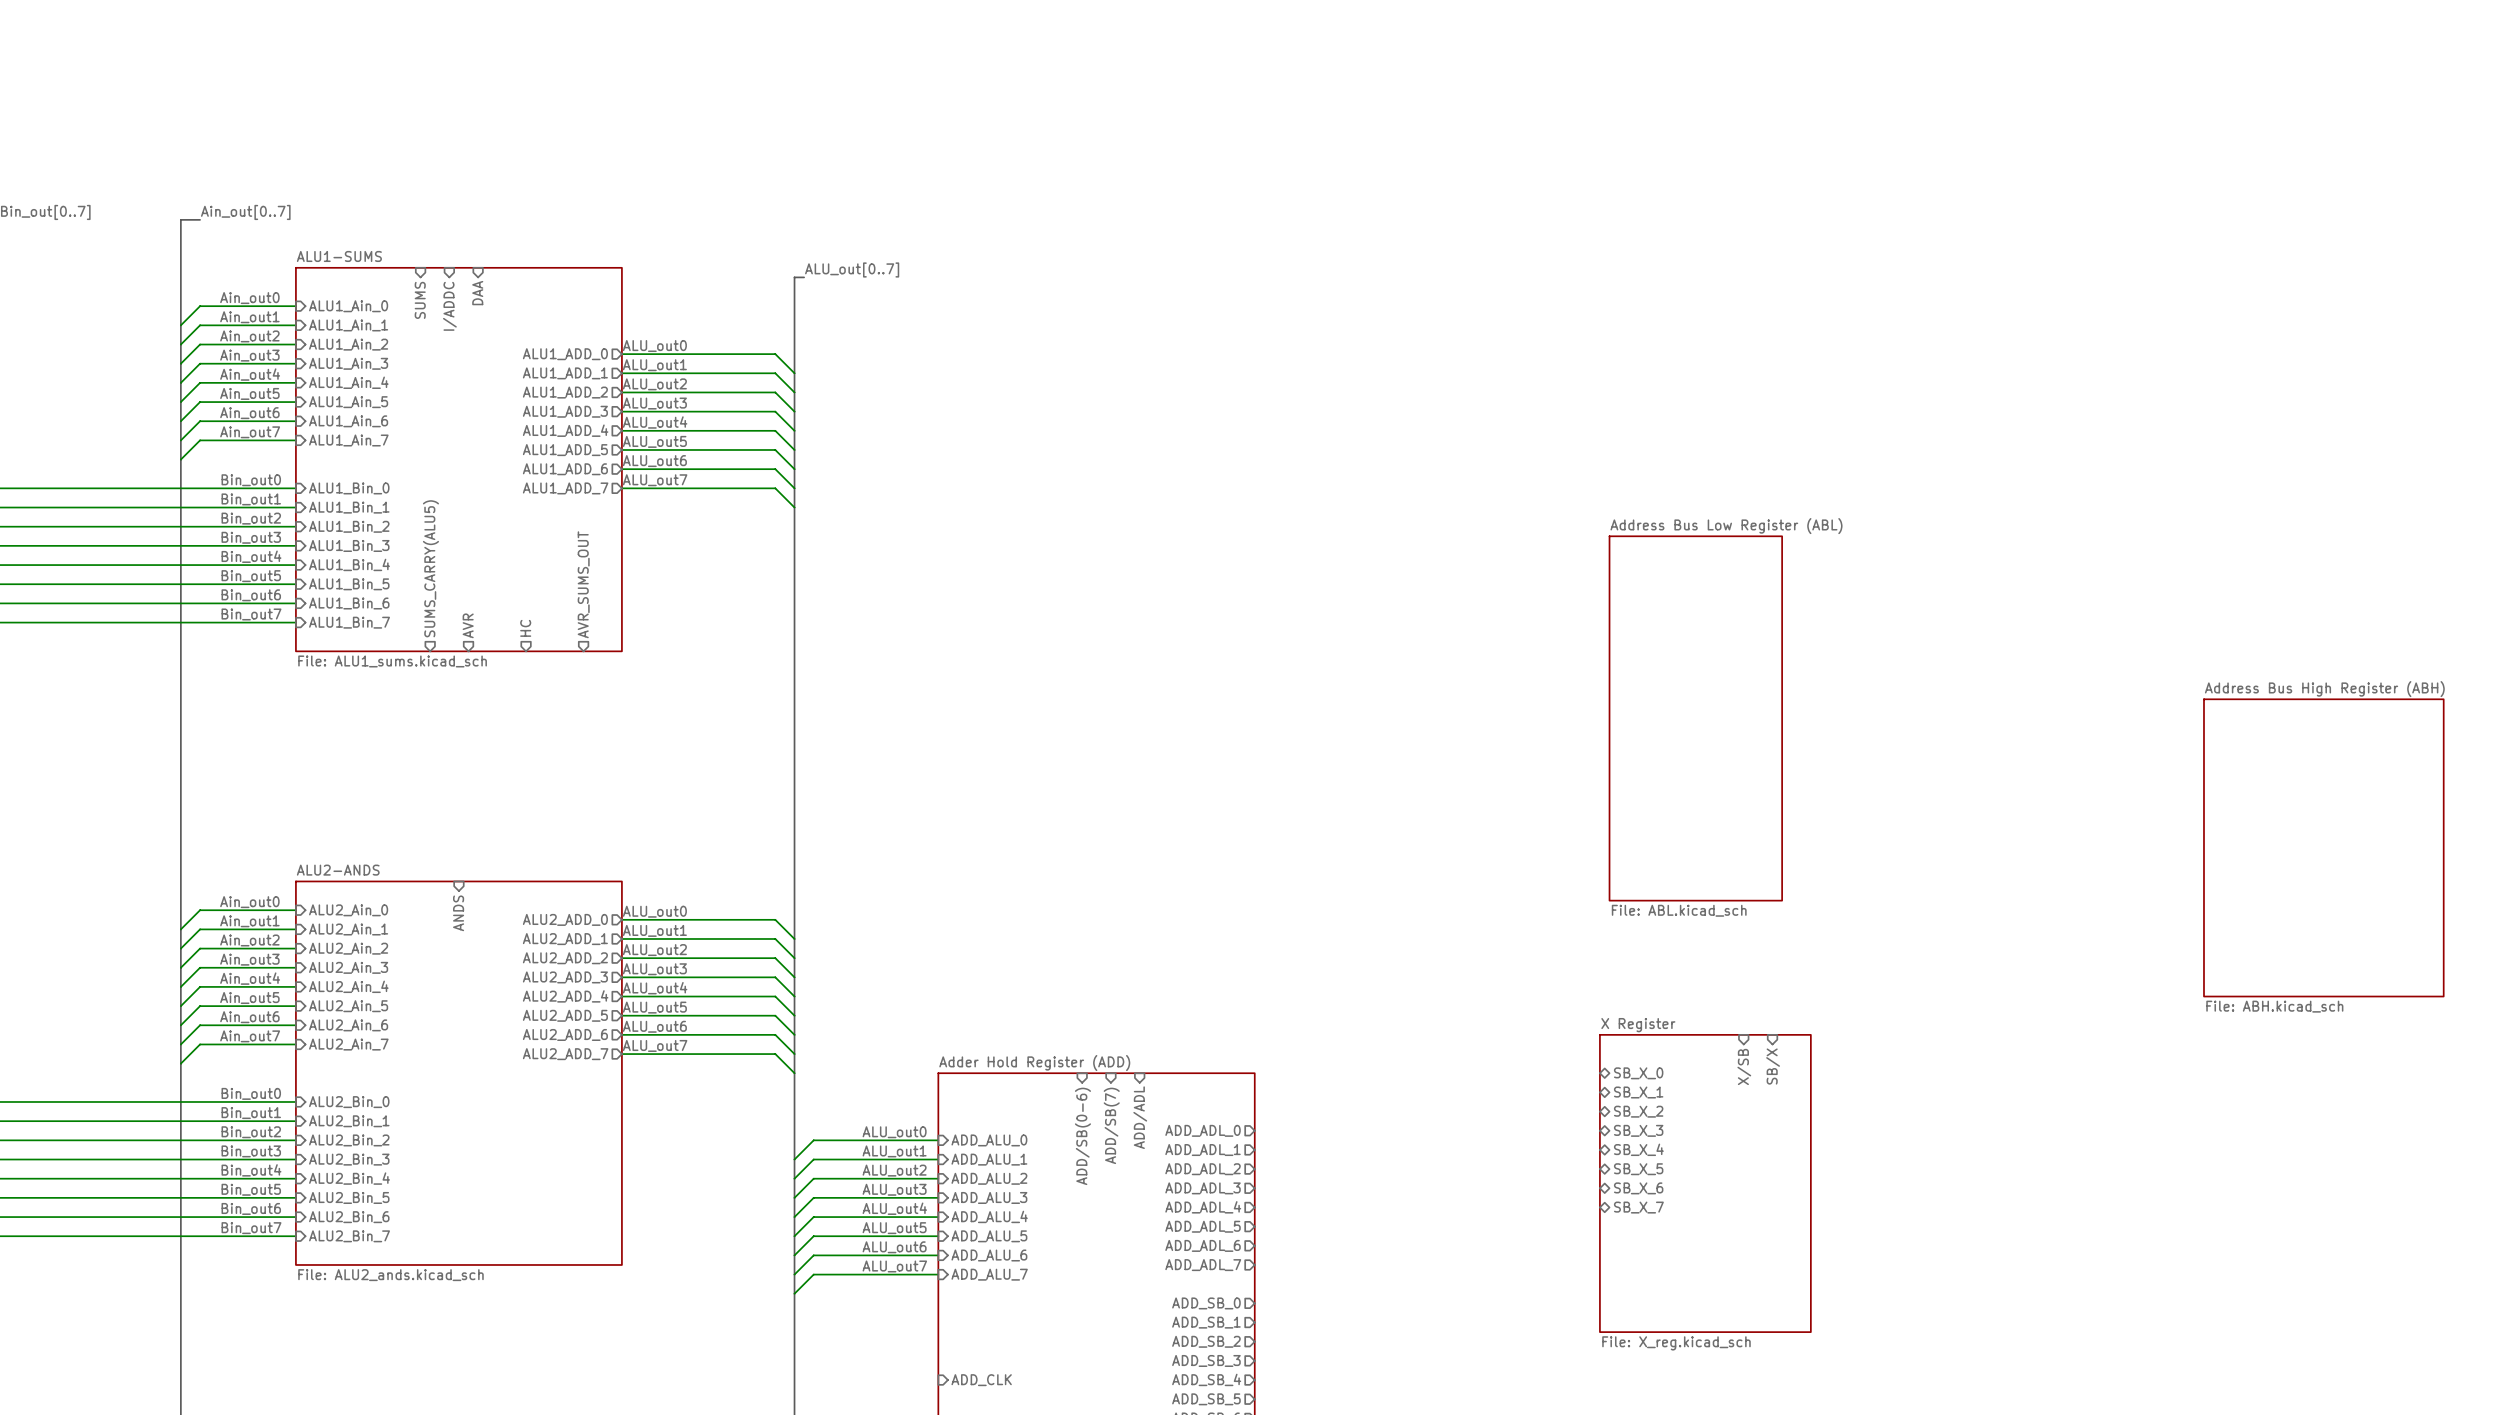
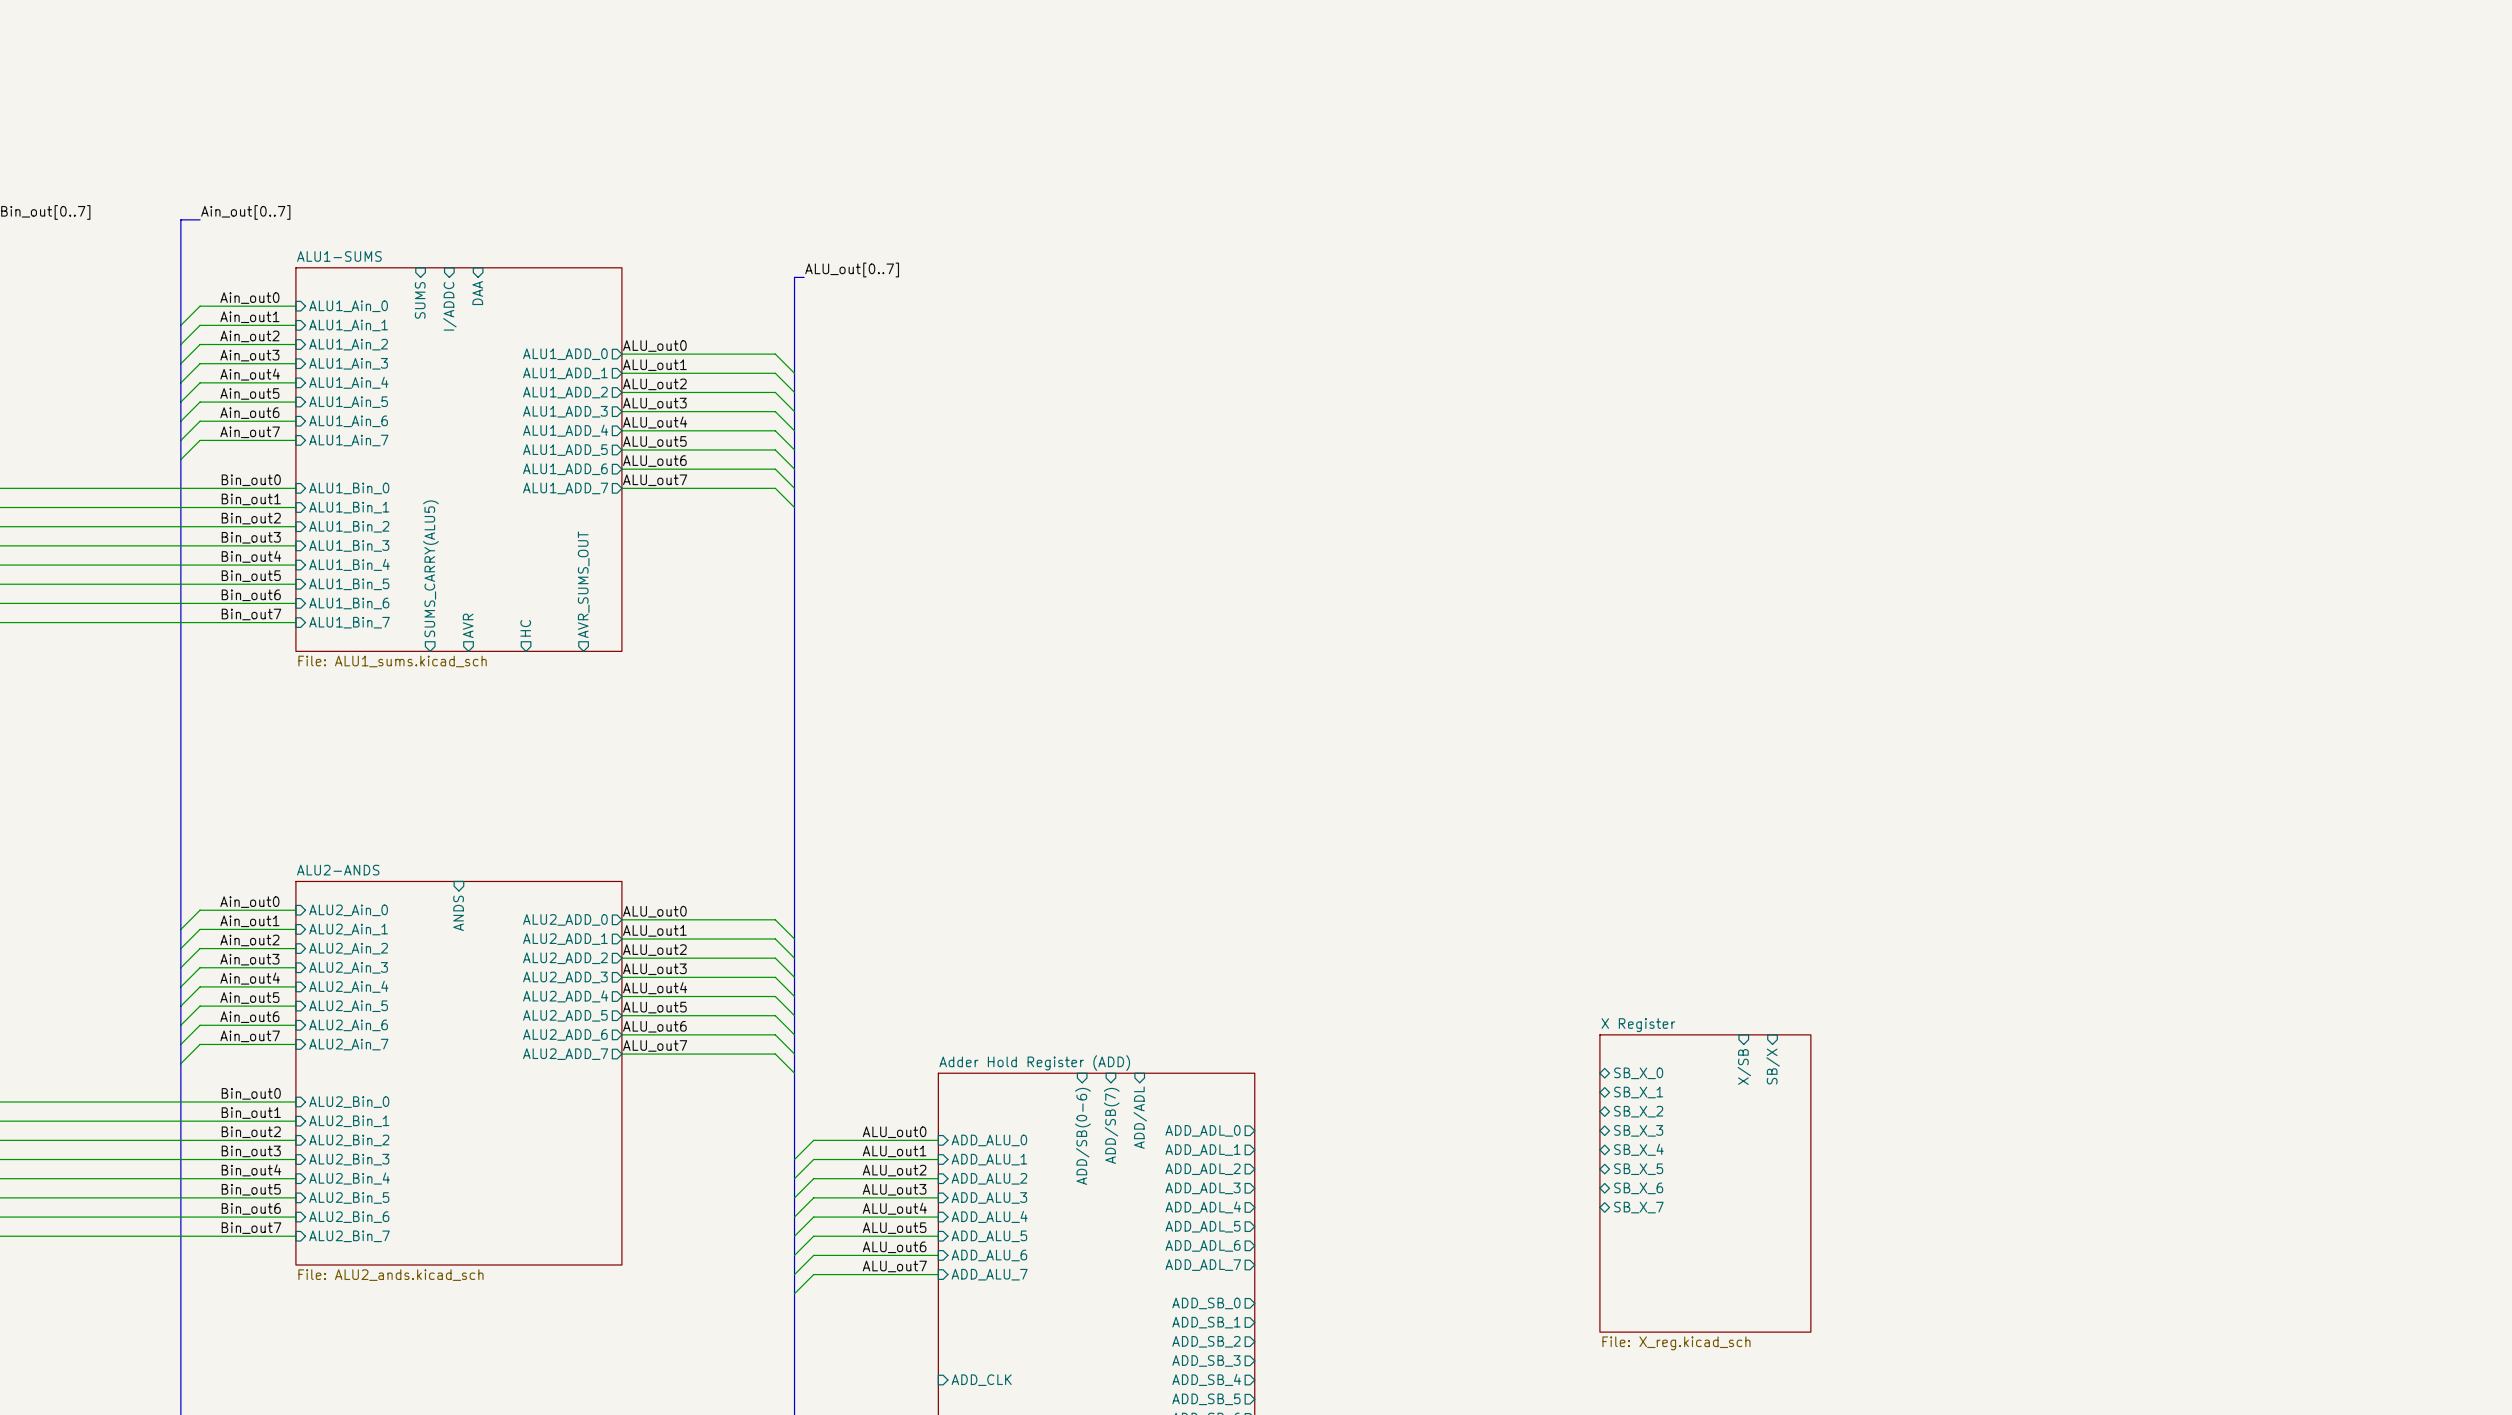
sheet Address Bus Low Register (ABL): File: ABL.kicad_sch (1695, 718) -> none
sheet Address Bus High Register (ABH): File: ABH.kicad_sch (2323, 847) -> none

